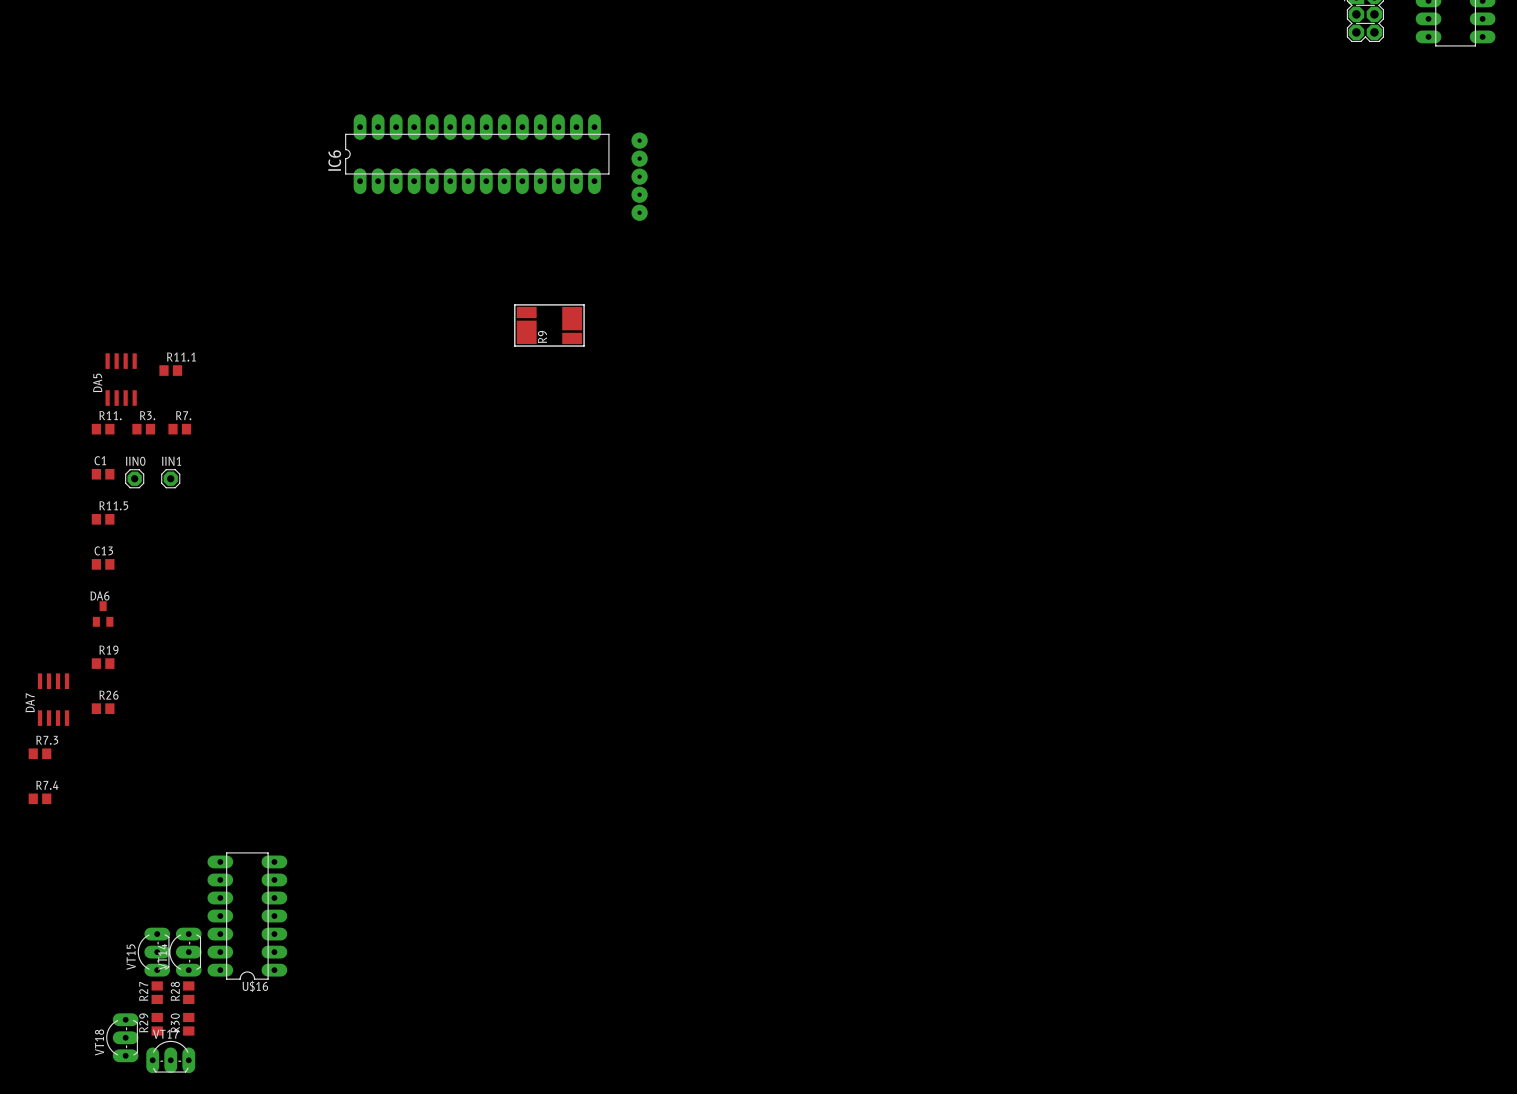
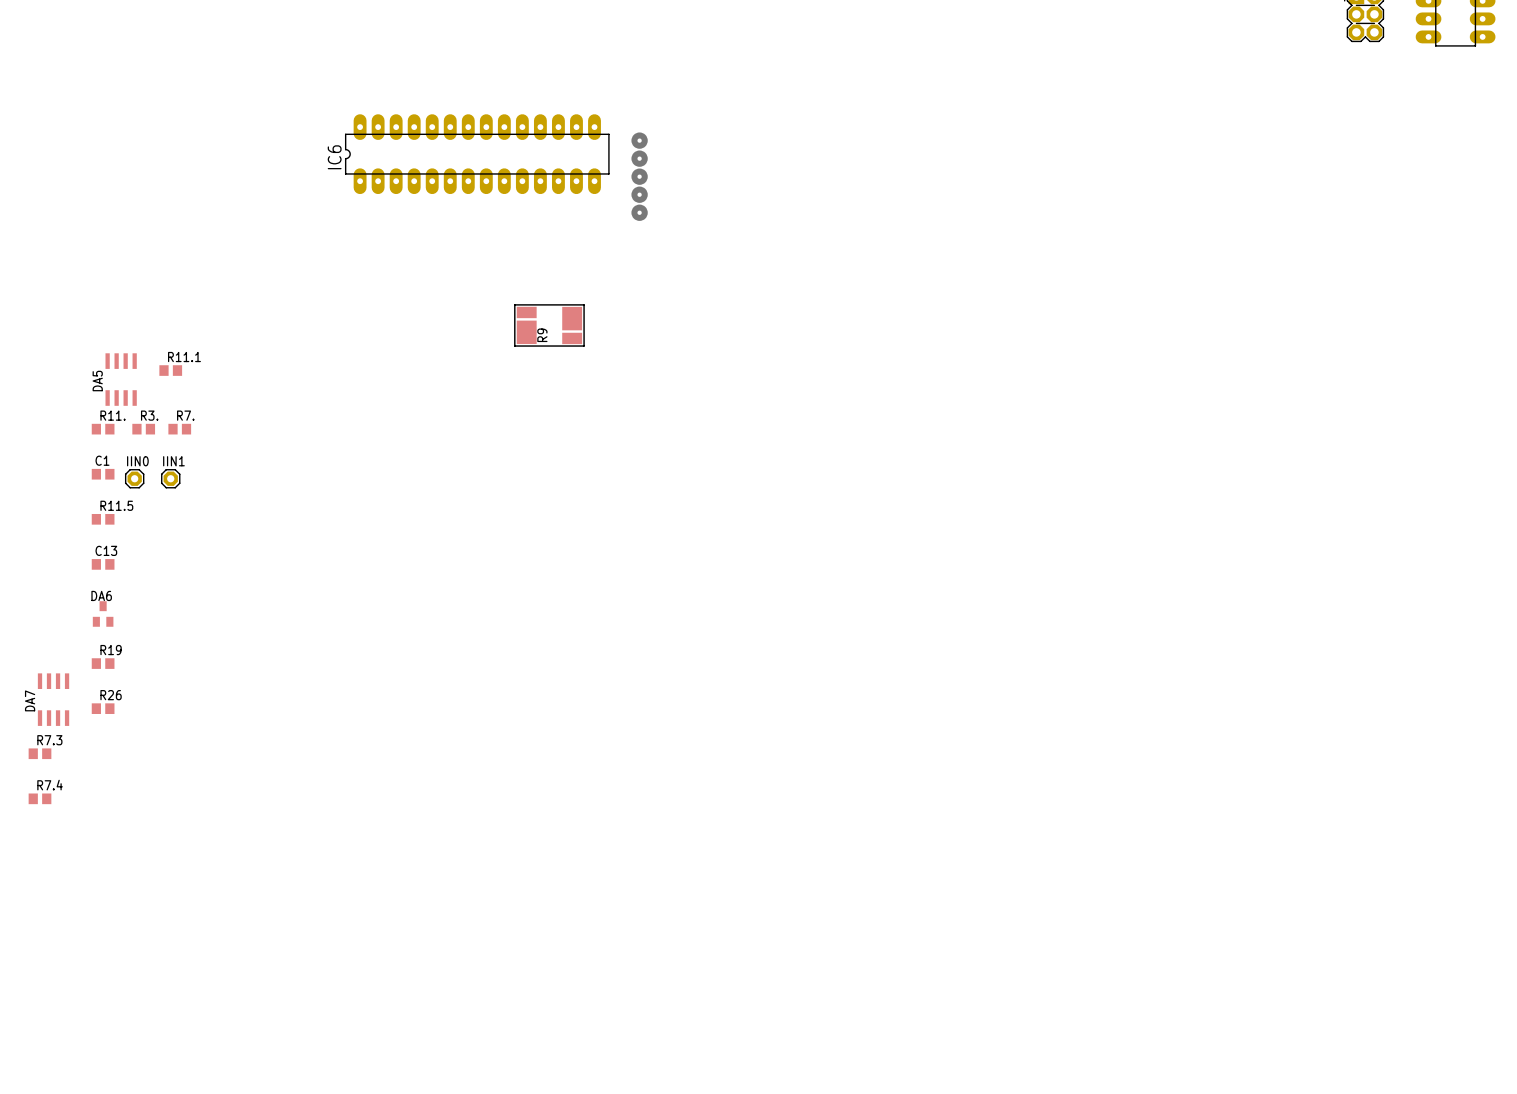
U$16: (247, 916) -> none
VT15: (153, 952) -> none
VT14: (185, 952) -> none
R27: (157, 992) -> none
R28: (188, 992) -> none
R29: (157, 1024) -> none
R30: (188, 1024) -> none
VT18: (122, 1037) -> none
VT17: (170, 1057) -> none

